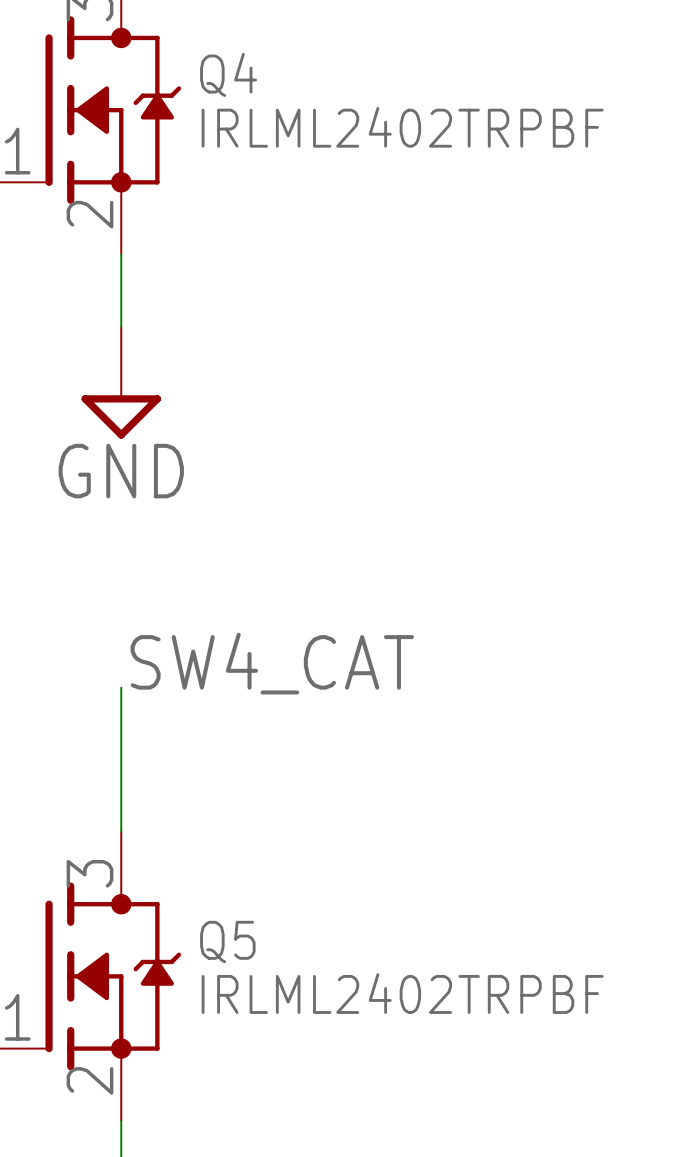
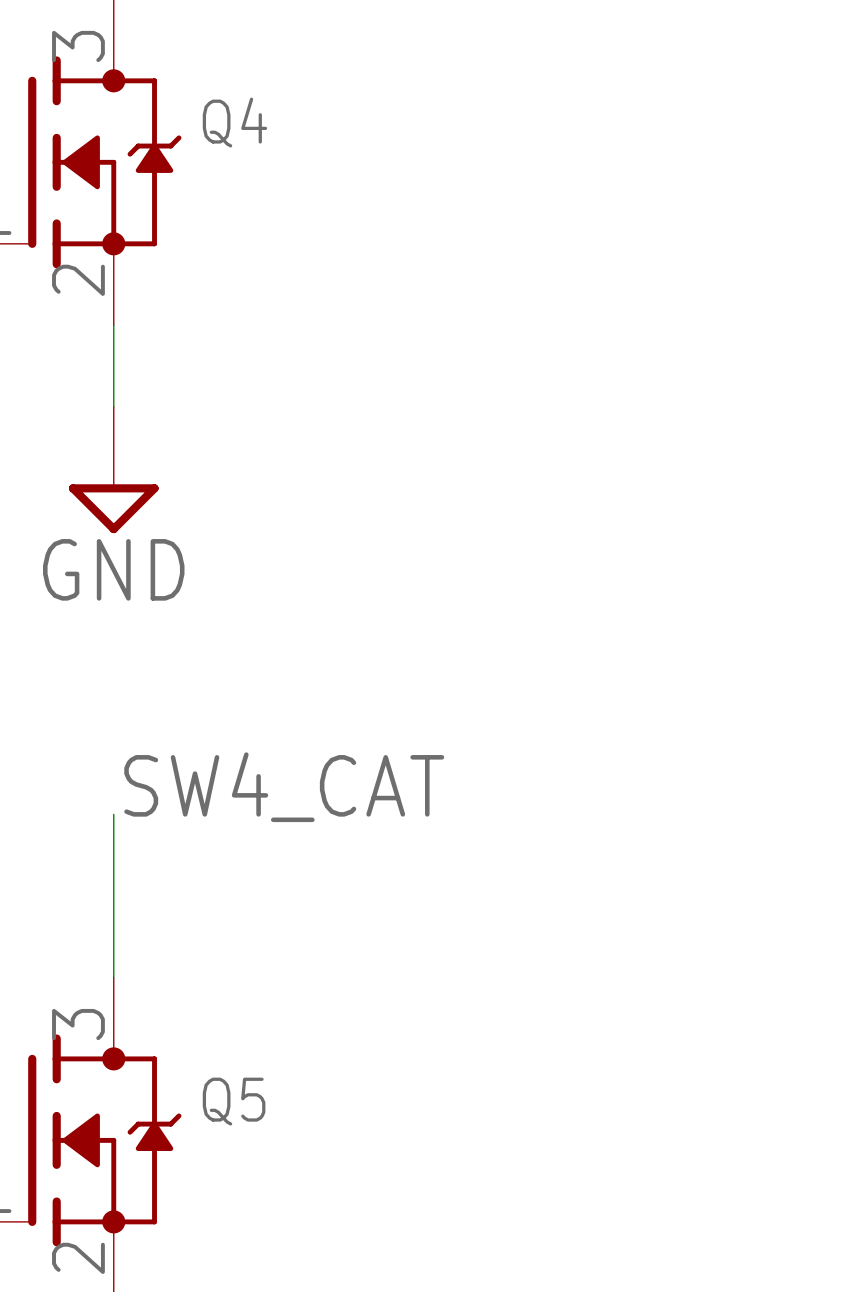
Q4 value: IRLML2402TRPBF (402, 127) -> none
Q5 value: IRLML2402TRPBF (402, 993) -> none

